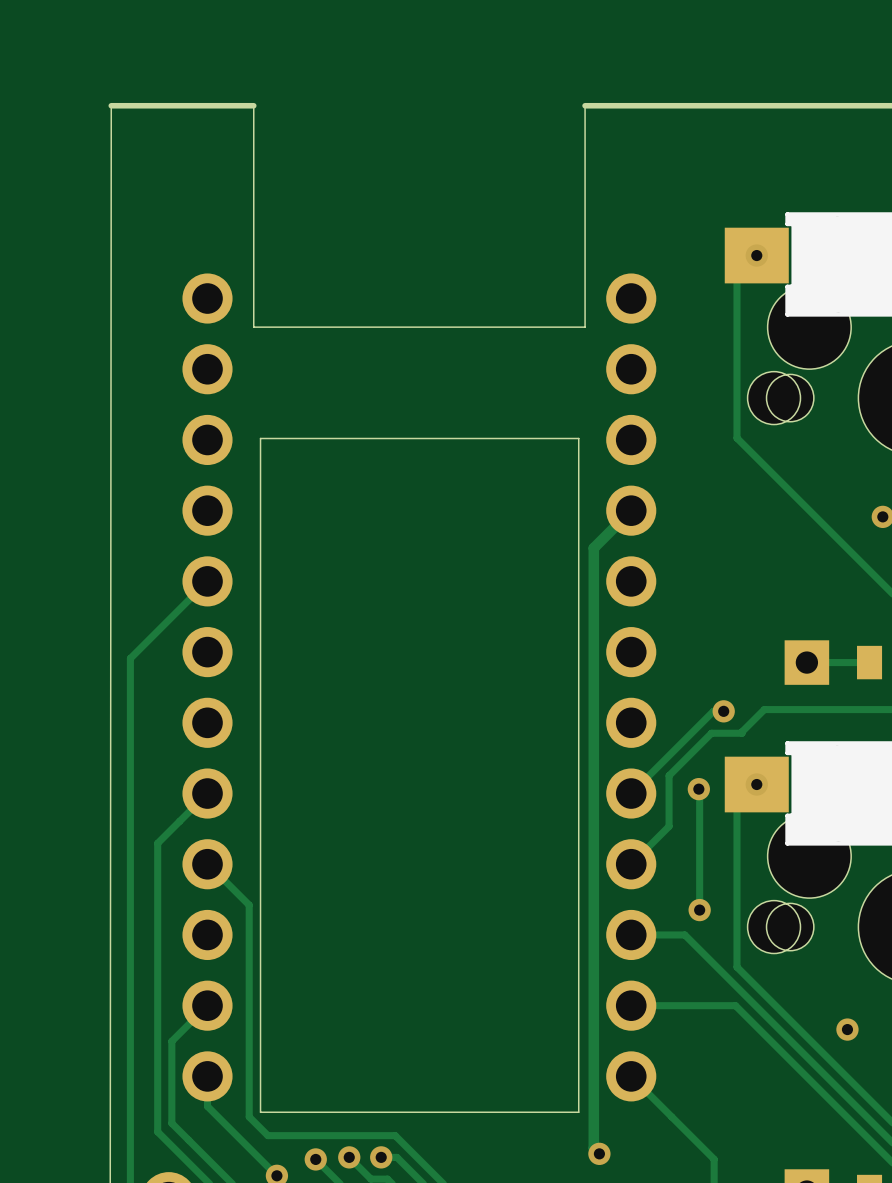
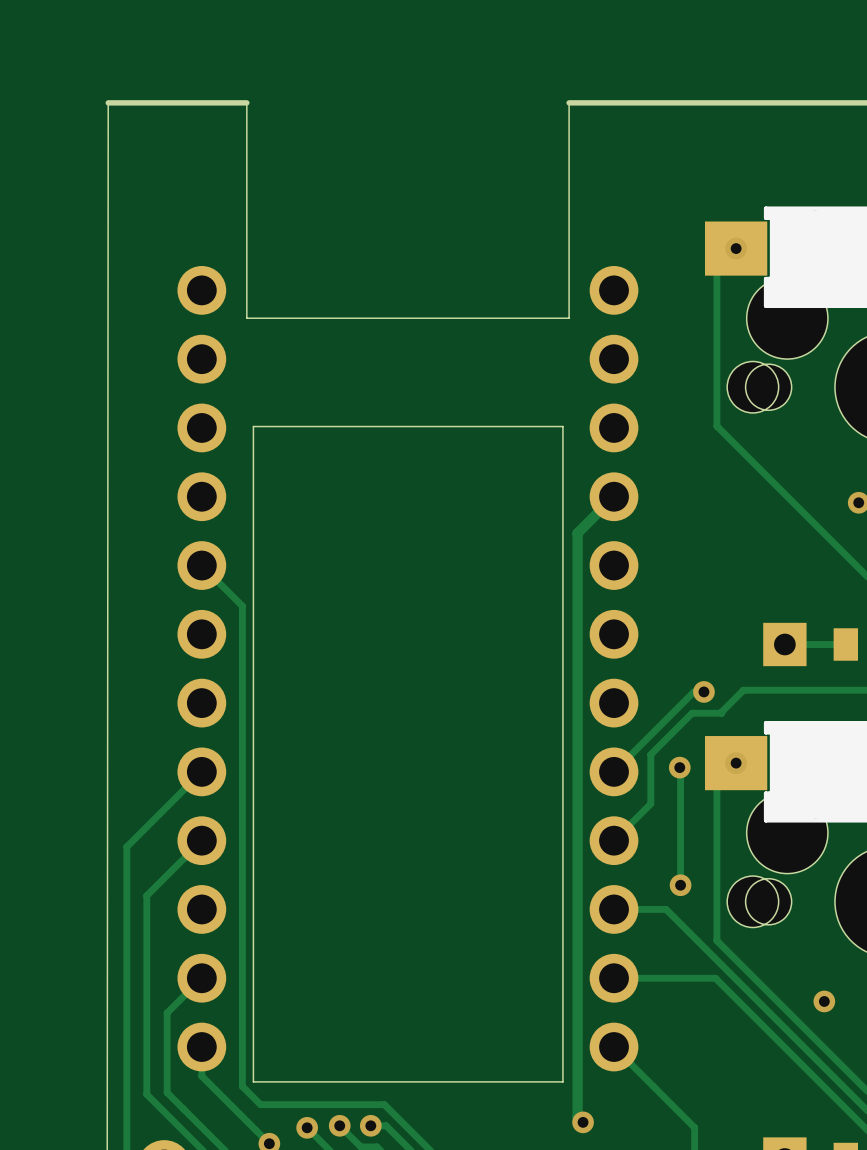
track: (207, 581) (130, 658) (130, 870) -> (201, 565) (242, 606) (242, 880)
track: (157, 843) (157, 1131) -> (201, 840) (146, 895) (146, 1094) (153, 1101)
track: none -> (153, 820) (126, 846)
track: (221, 864) (221, 877) (249, 905) -> none

